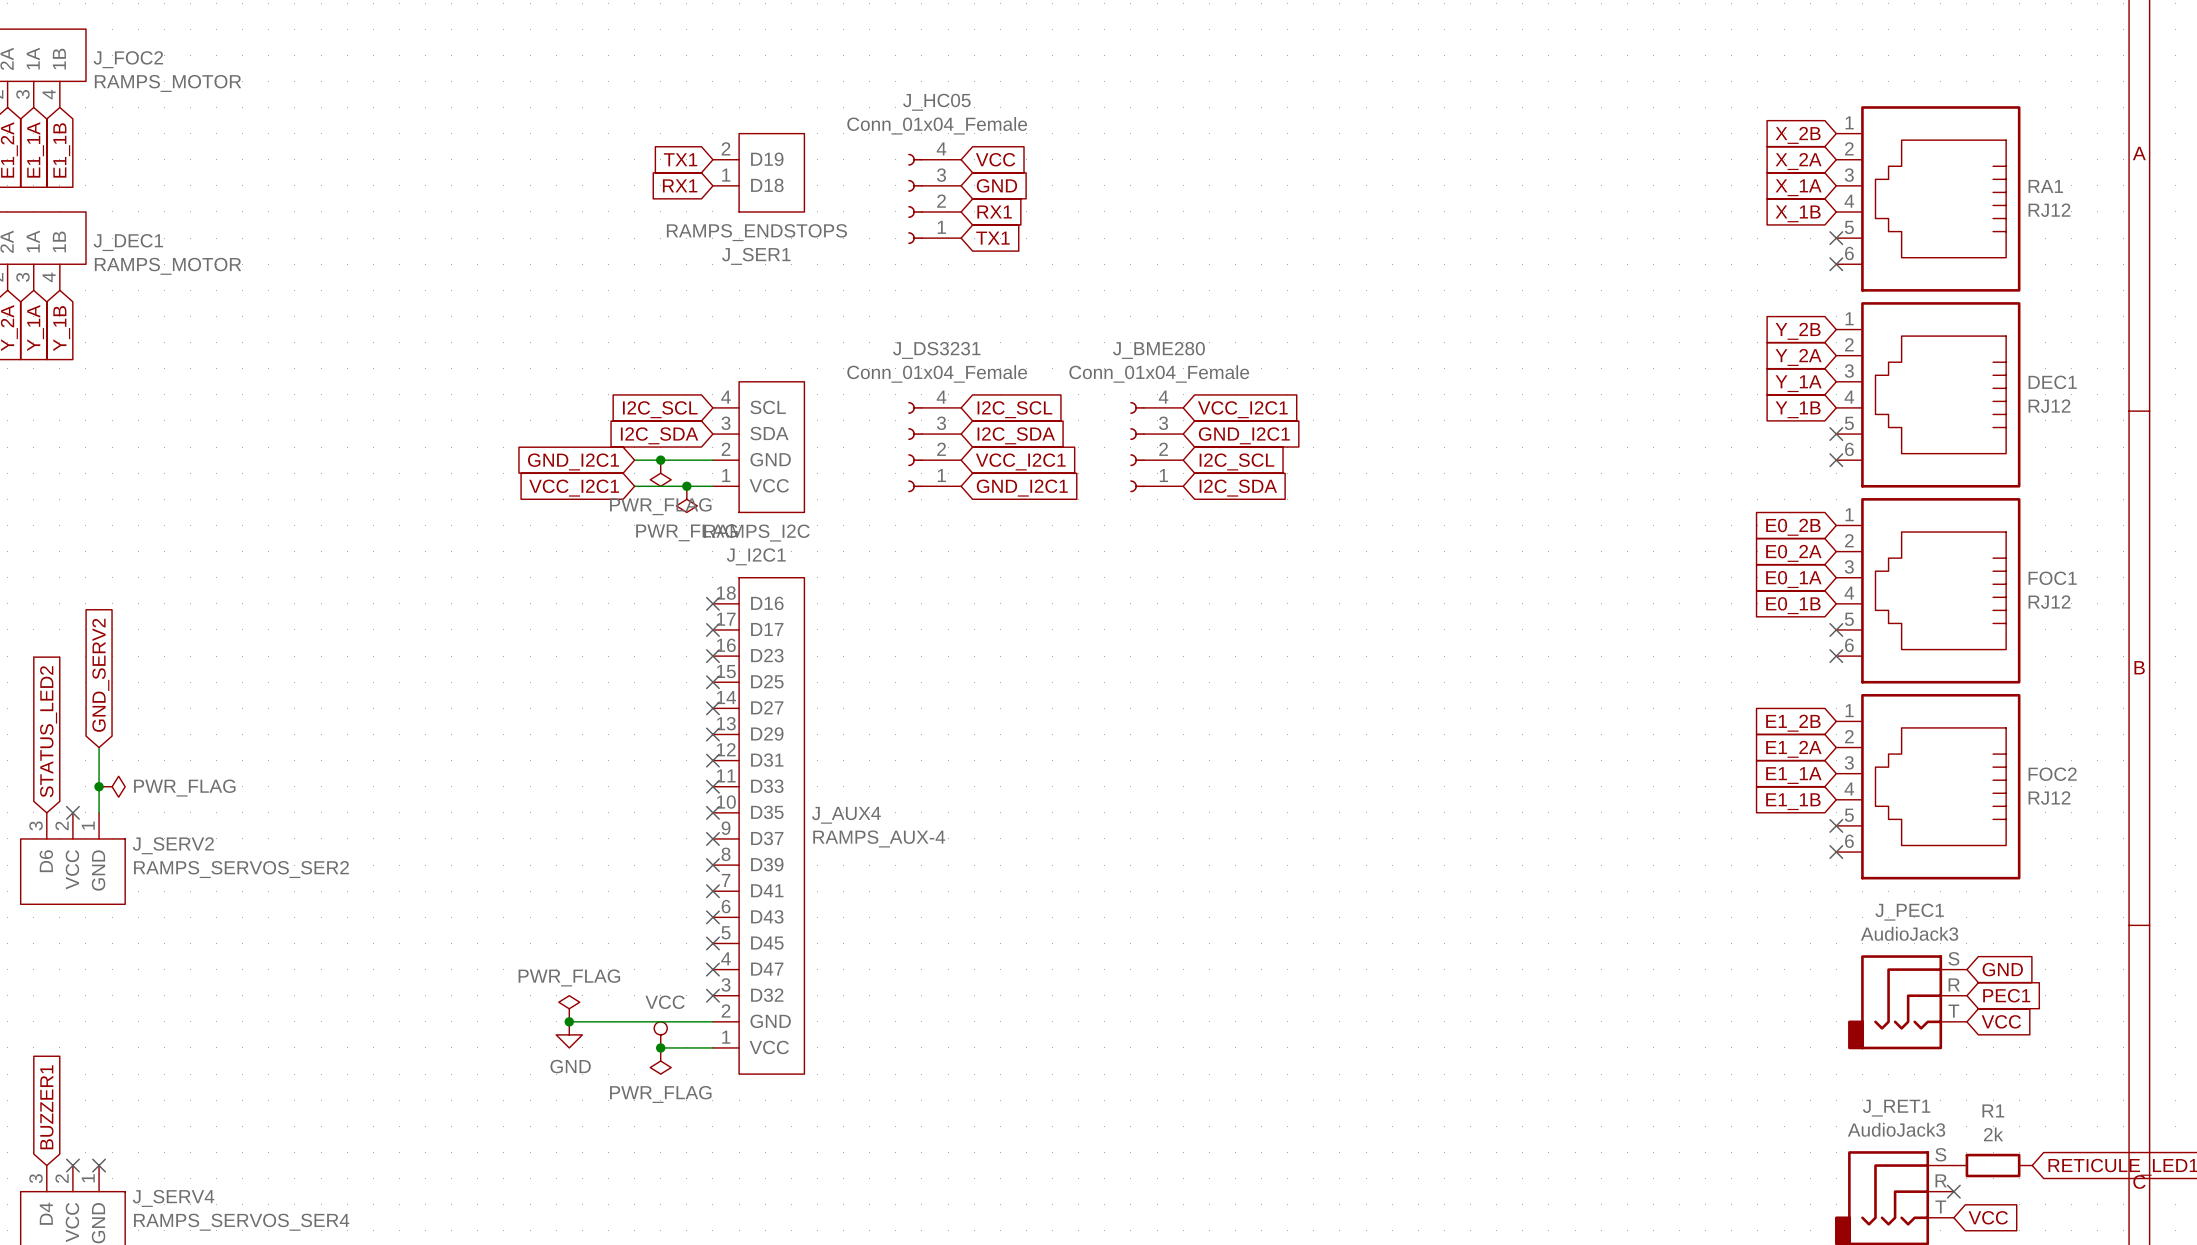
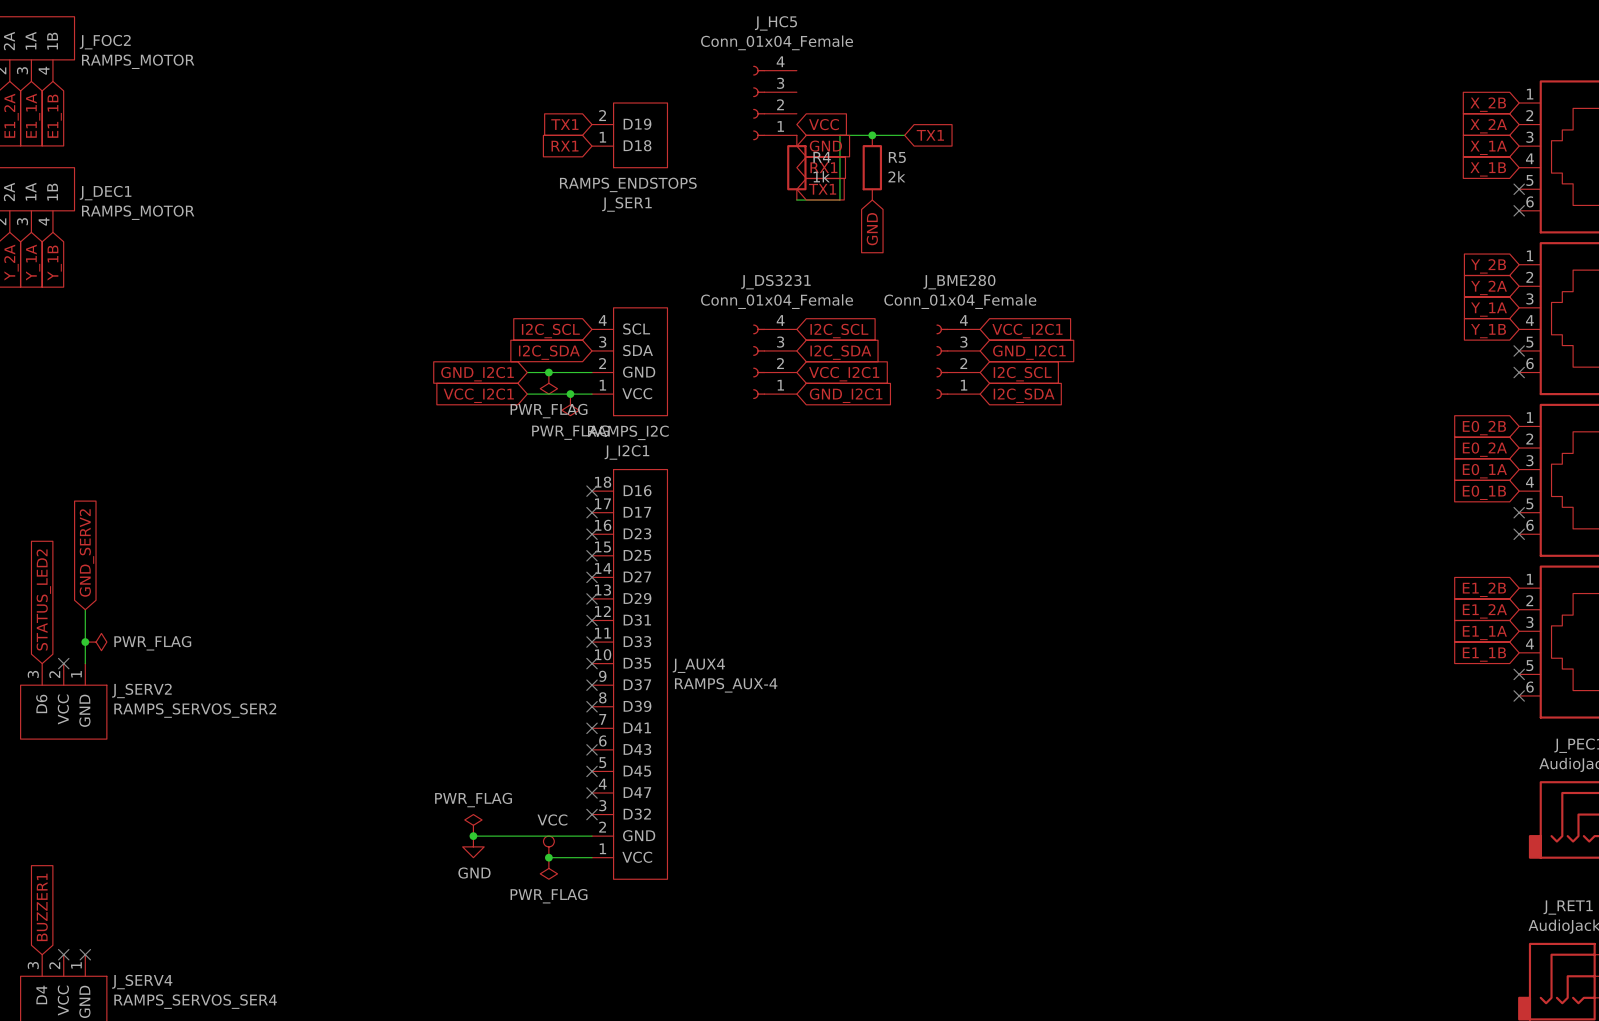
J_HC5: none -> Conn_01x04_Female (774, 103)
junction: none -> (872, 135)
wire: none -> (904, 135) (839, 135) (839, 200) (796, 200)
global label: none -> TX1 (930, 135)
J_HC05: Conn_01x04_Female (934, 198) -> none
R4: none -> 1k (796, 167)
R5: none -> 2k (872, 167)
global label: none -> GND (872, 229)

